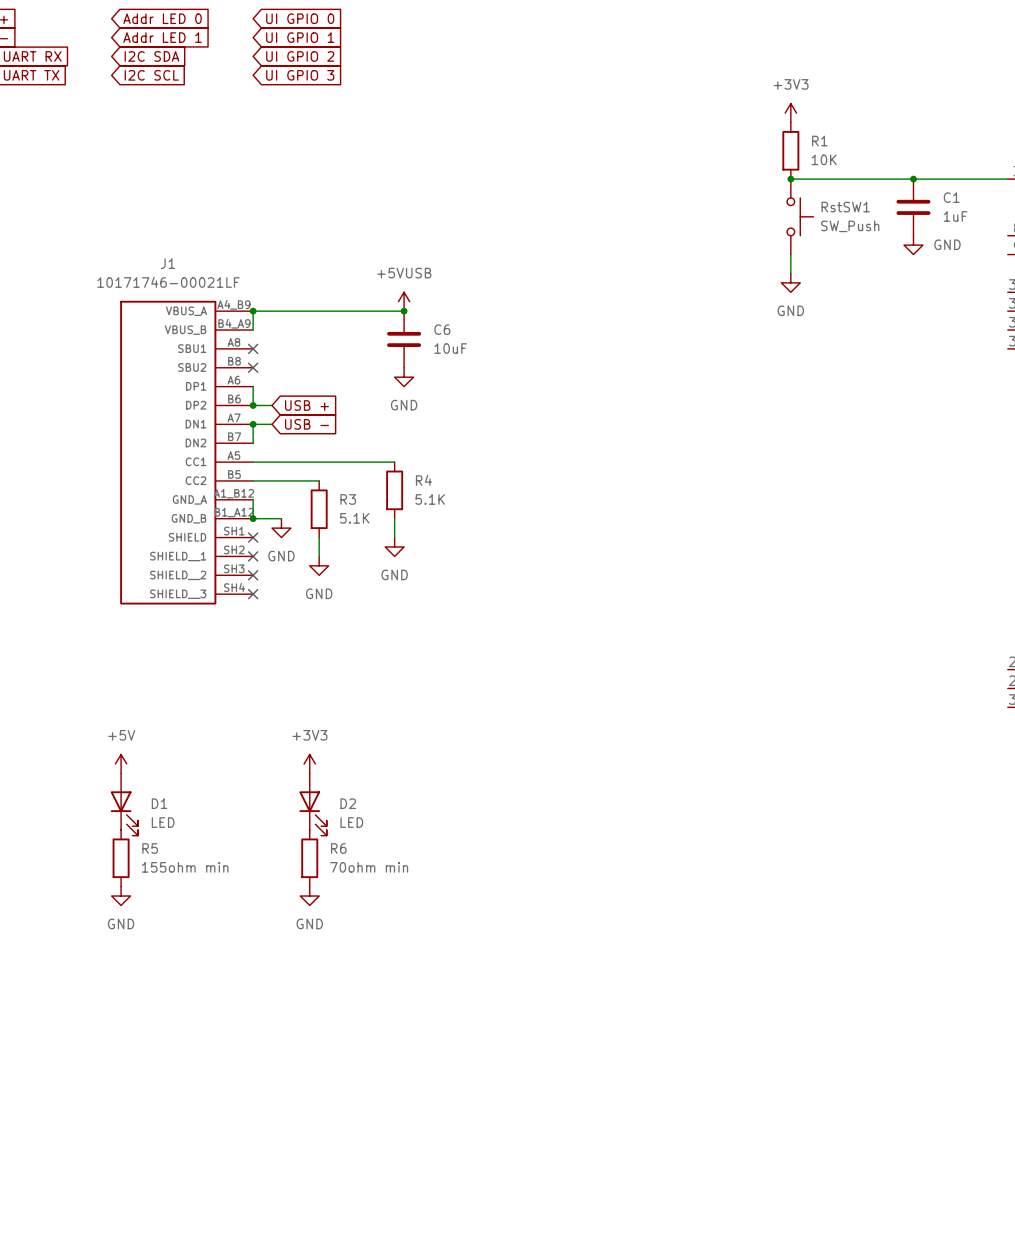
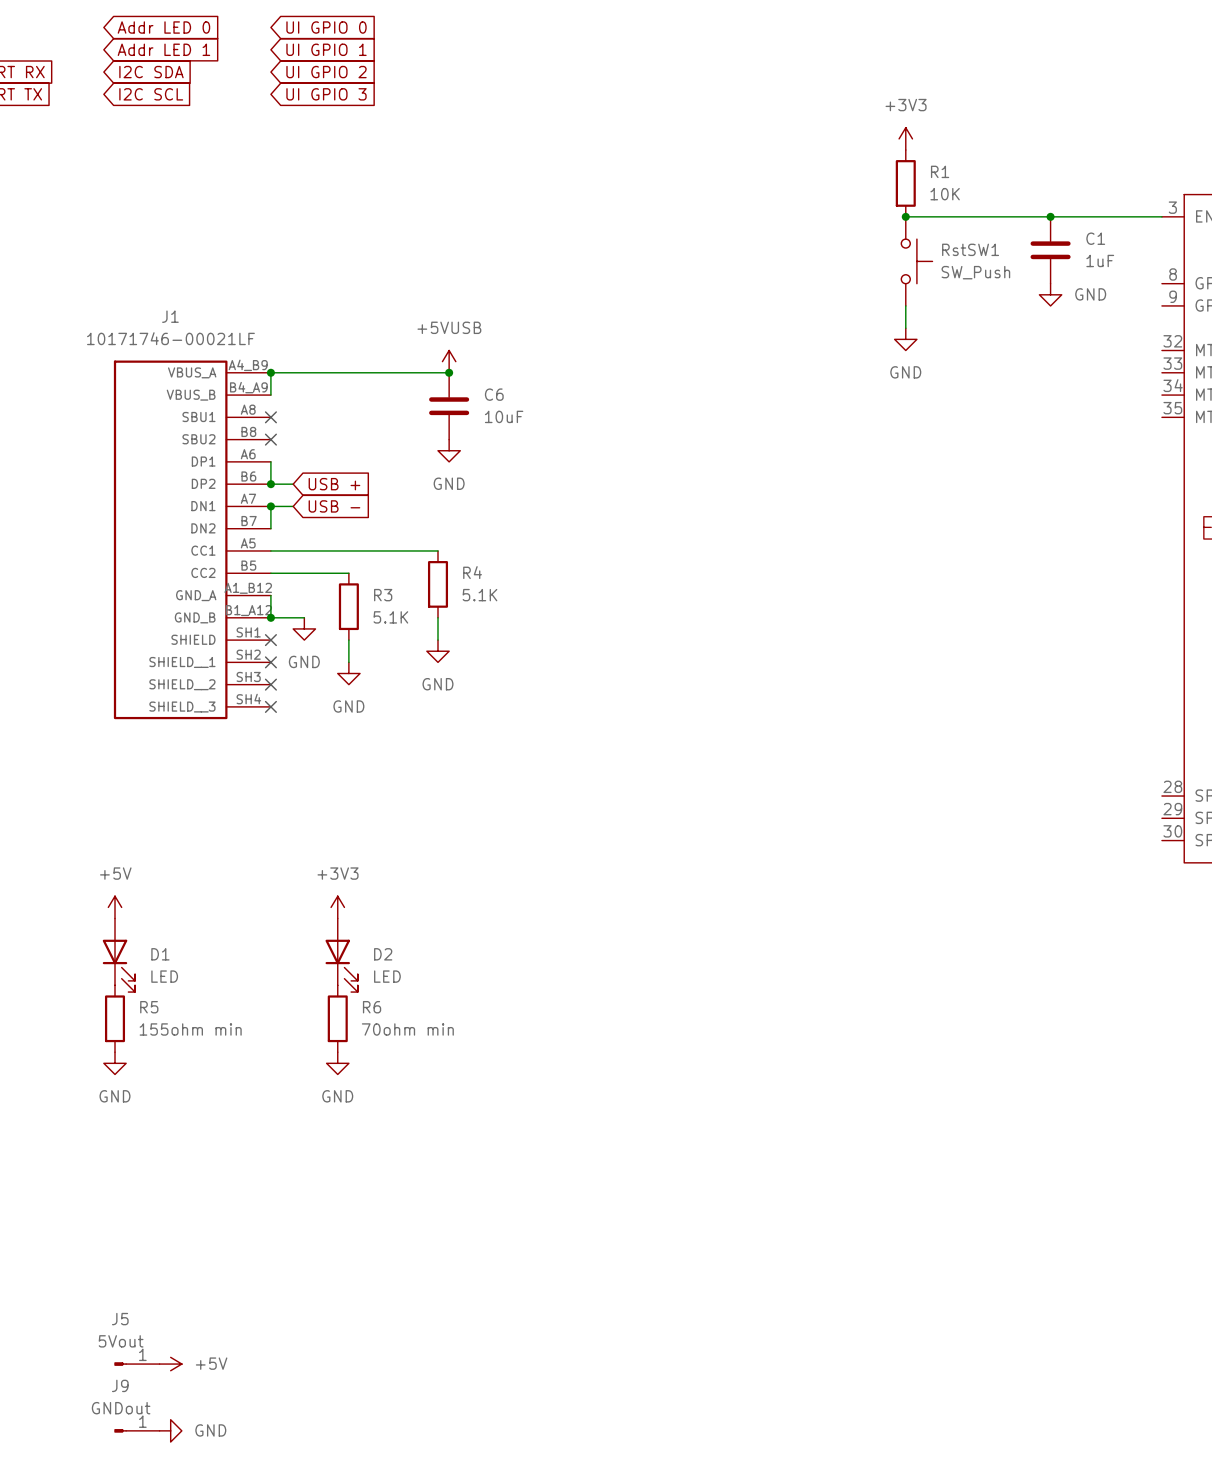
J5: none -> 5Vout (136, 1364)
power symbol: none -> +5V (170, 1364)
J9: none -> GNDout (136, 1430)
power symbol: none -> GND (170, 1430)

